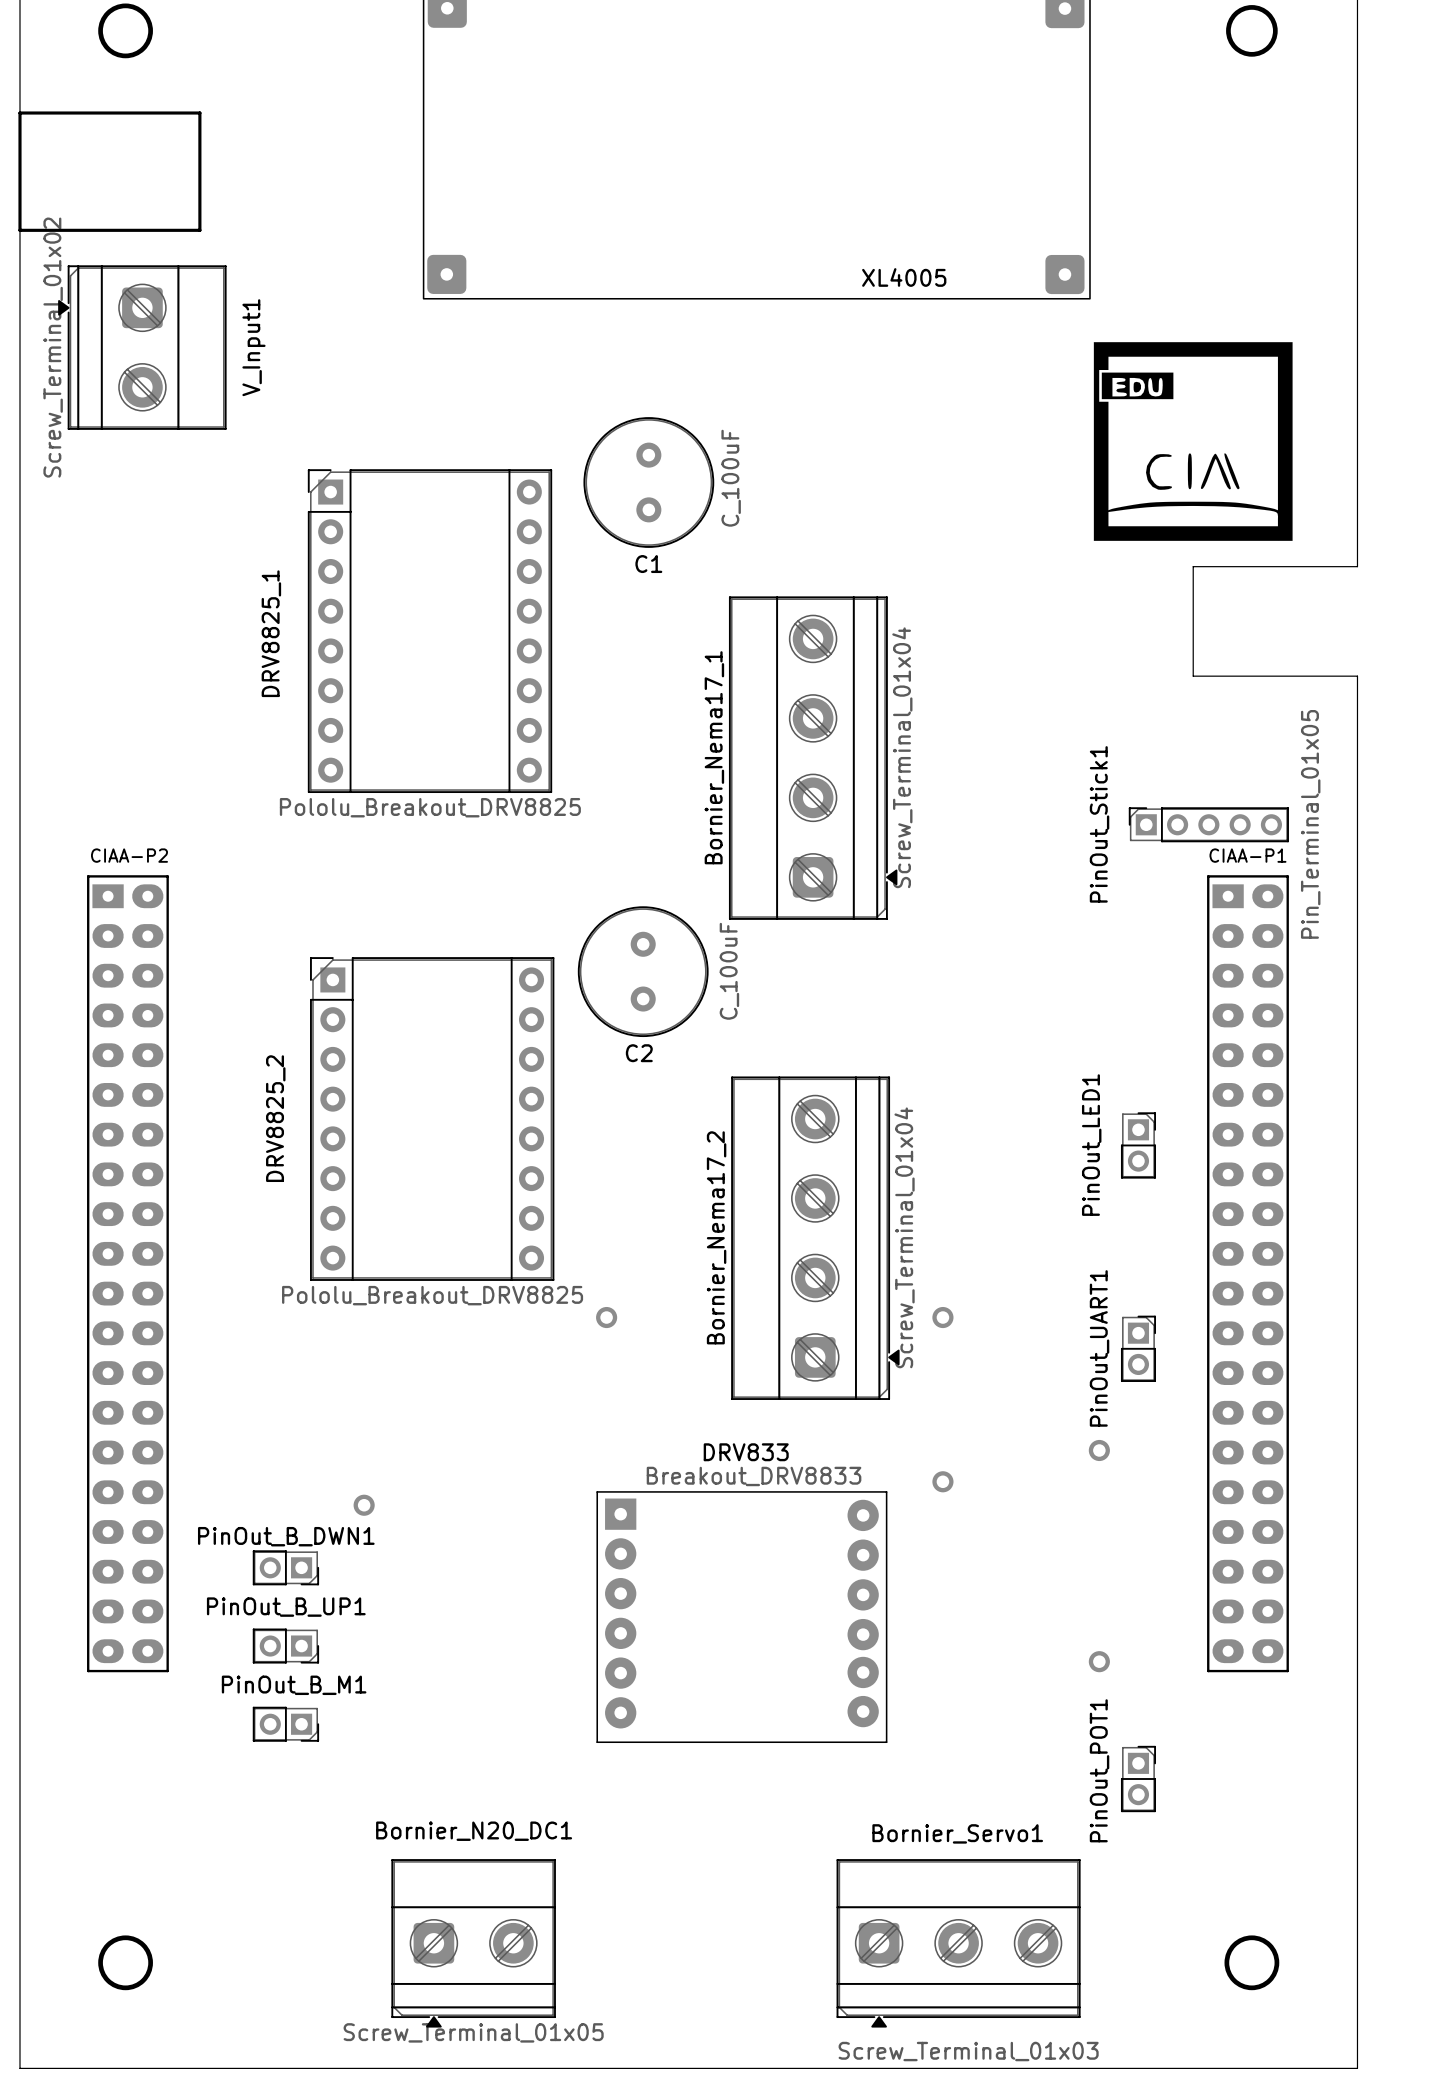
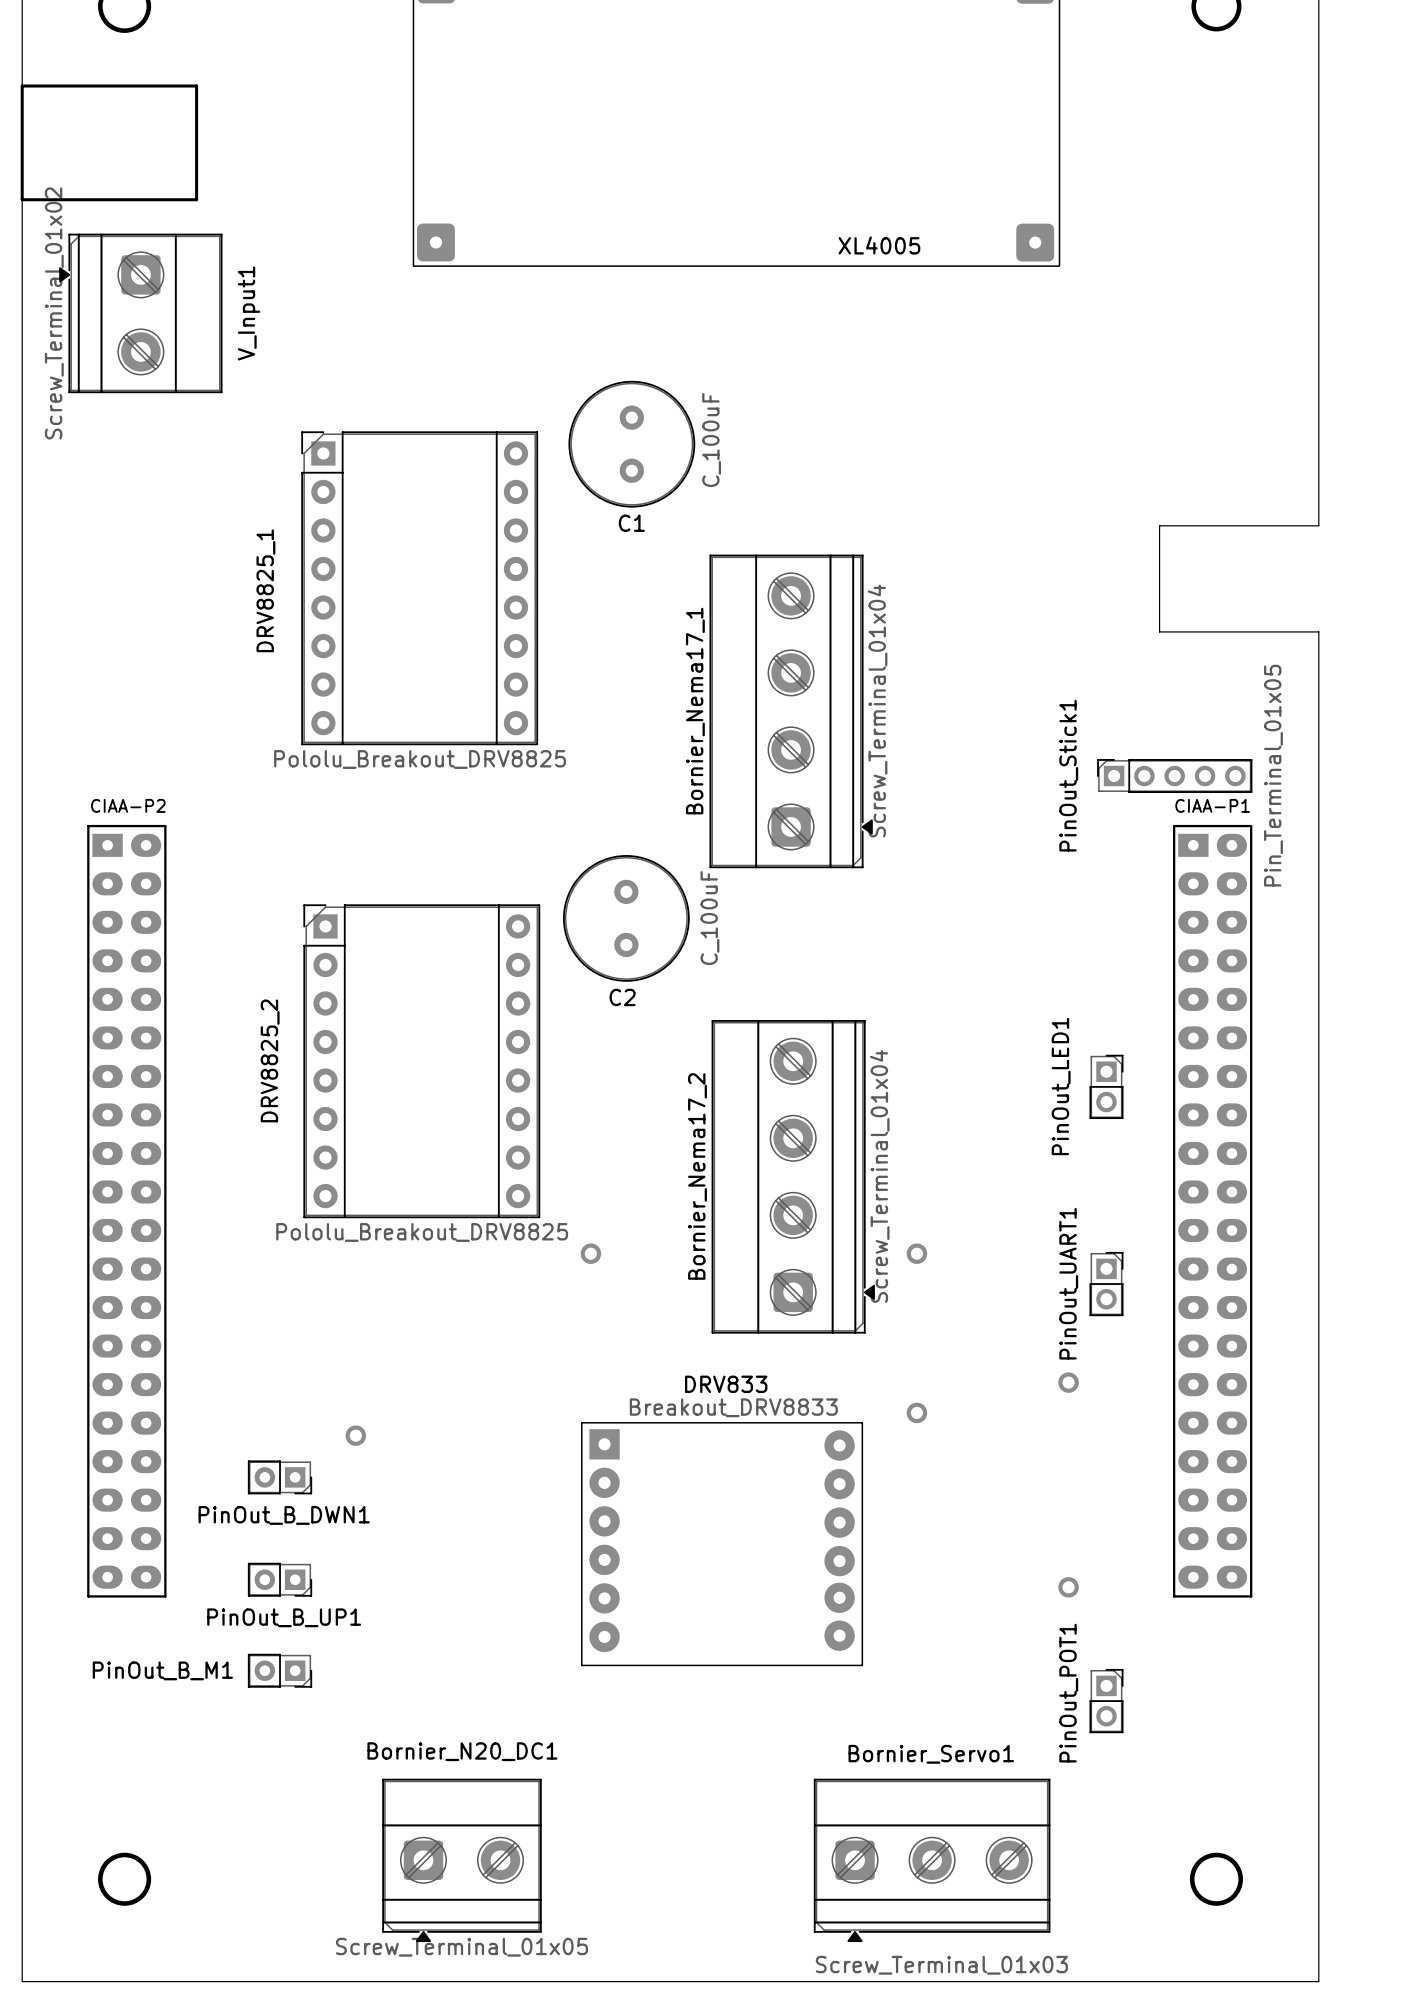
drawing: [1093, 342, 1293, 541] -> none
PinOut_B_DWN1 name position: PinOut_B_DWN1 (286, 1536) -> PinOut_B_DWN1 (284, 1515)
PinOut_B_DWN1 footprint: [252, 1550, 320, 1586] -> [247, 1460, 313, 1495]
PinOut_B_UP1 name position: PinOut_B_UP1 (286, 1607) -> PinOut_B_UP1 (284, 1617)
PinOut_B_UP1 footprint: [252, 1628, 320, 1664] -> [247, 1562, 313, 1597]
PinOut_B_M1 name position: PinOut_B_M1 (294, 1685) -> PinOut_B_M1 (162, 1670)
PinOut_B_M1 footprint: [252, 1706, 320, 1742] -> [247, 1653, 313, 1688]

